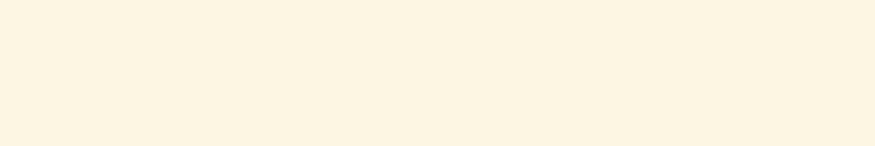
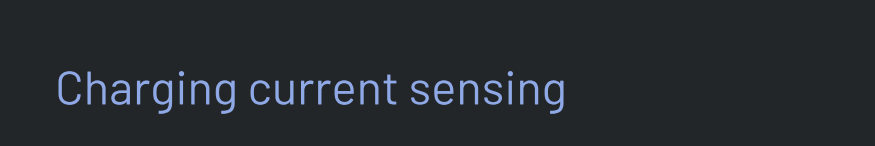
text: none -> Charging current sensing (311, 92)

